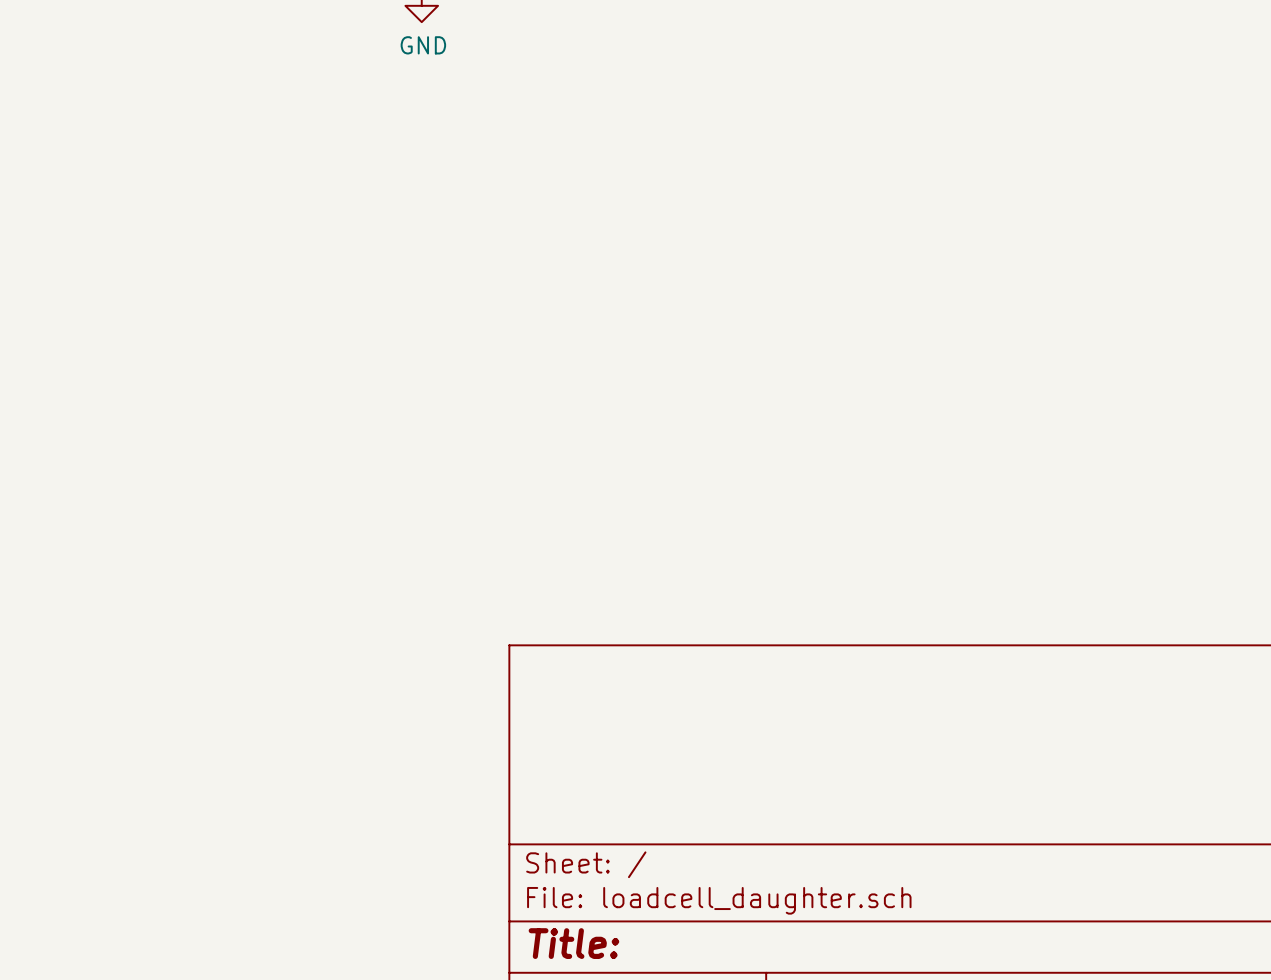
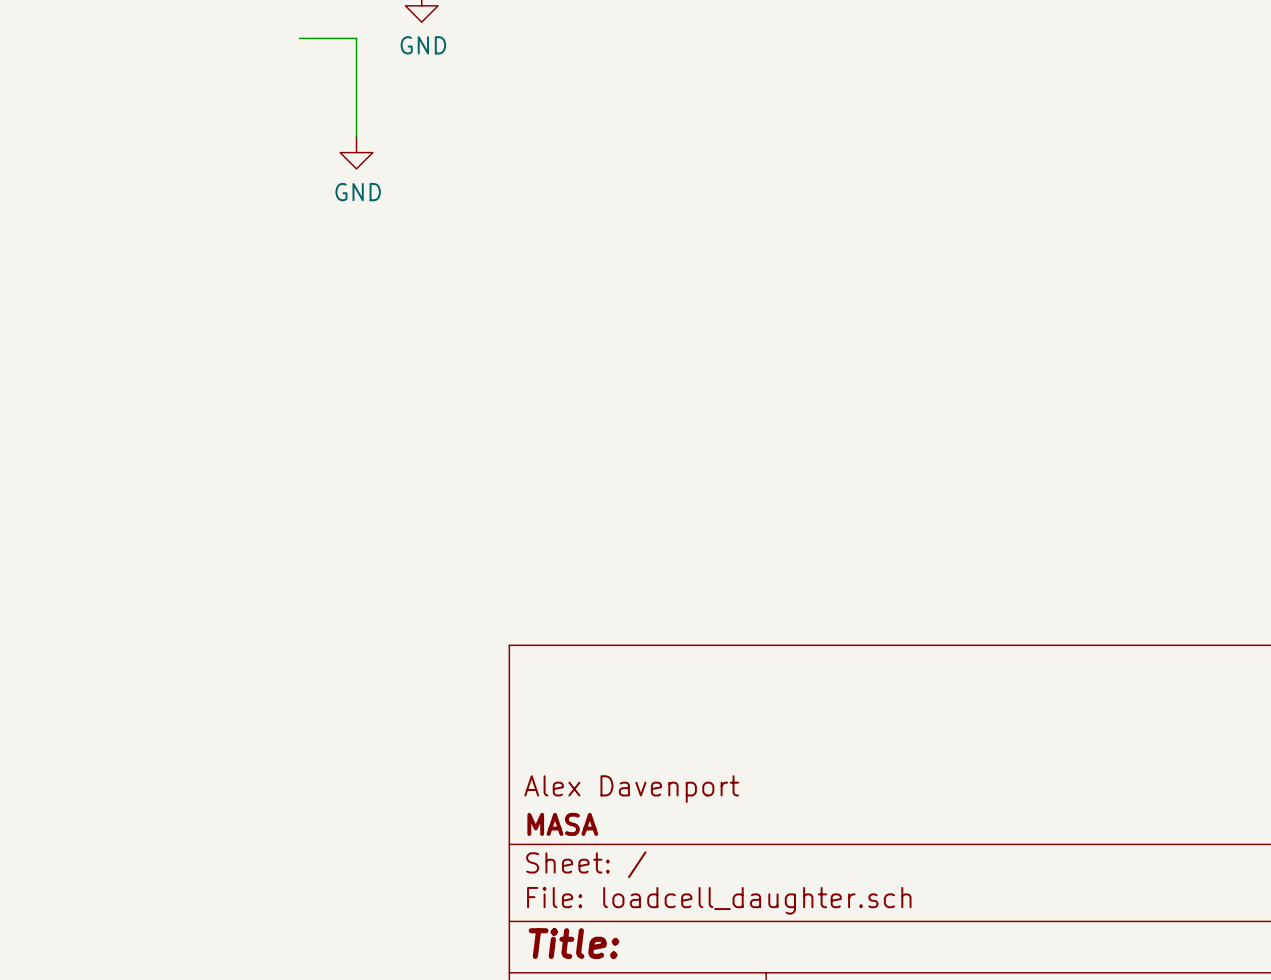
wire: none -> (299, 38) (356, 38) (356, 136)
power symbol: none -> GND (356, 152)
title block: none -> Alex Davenport (631, 789)
title block: none -> MASA (562, 824)

